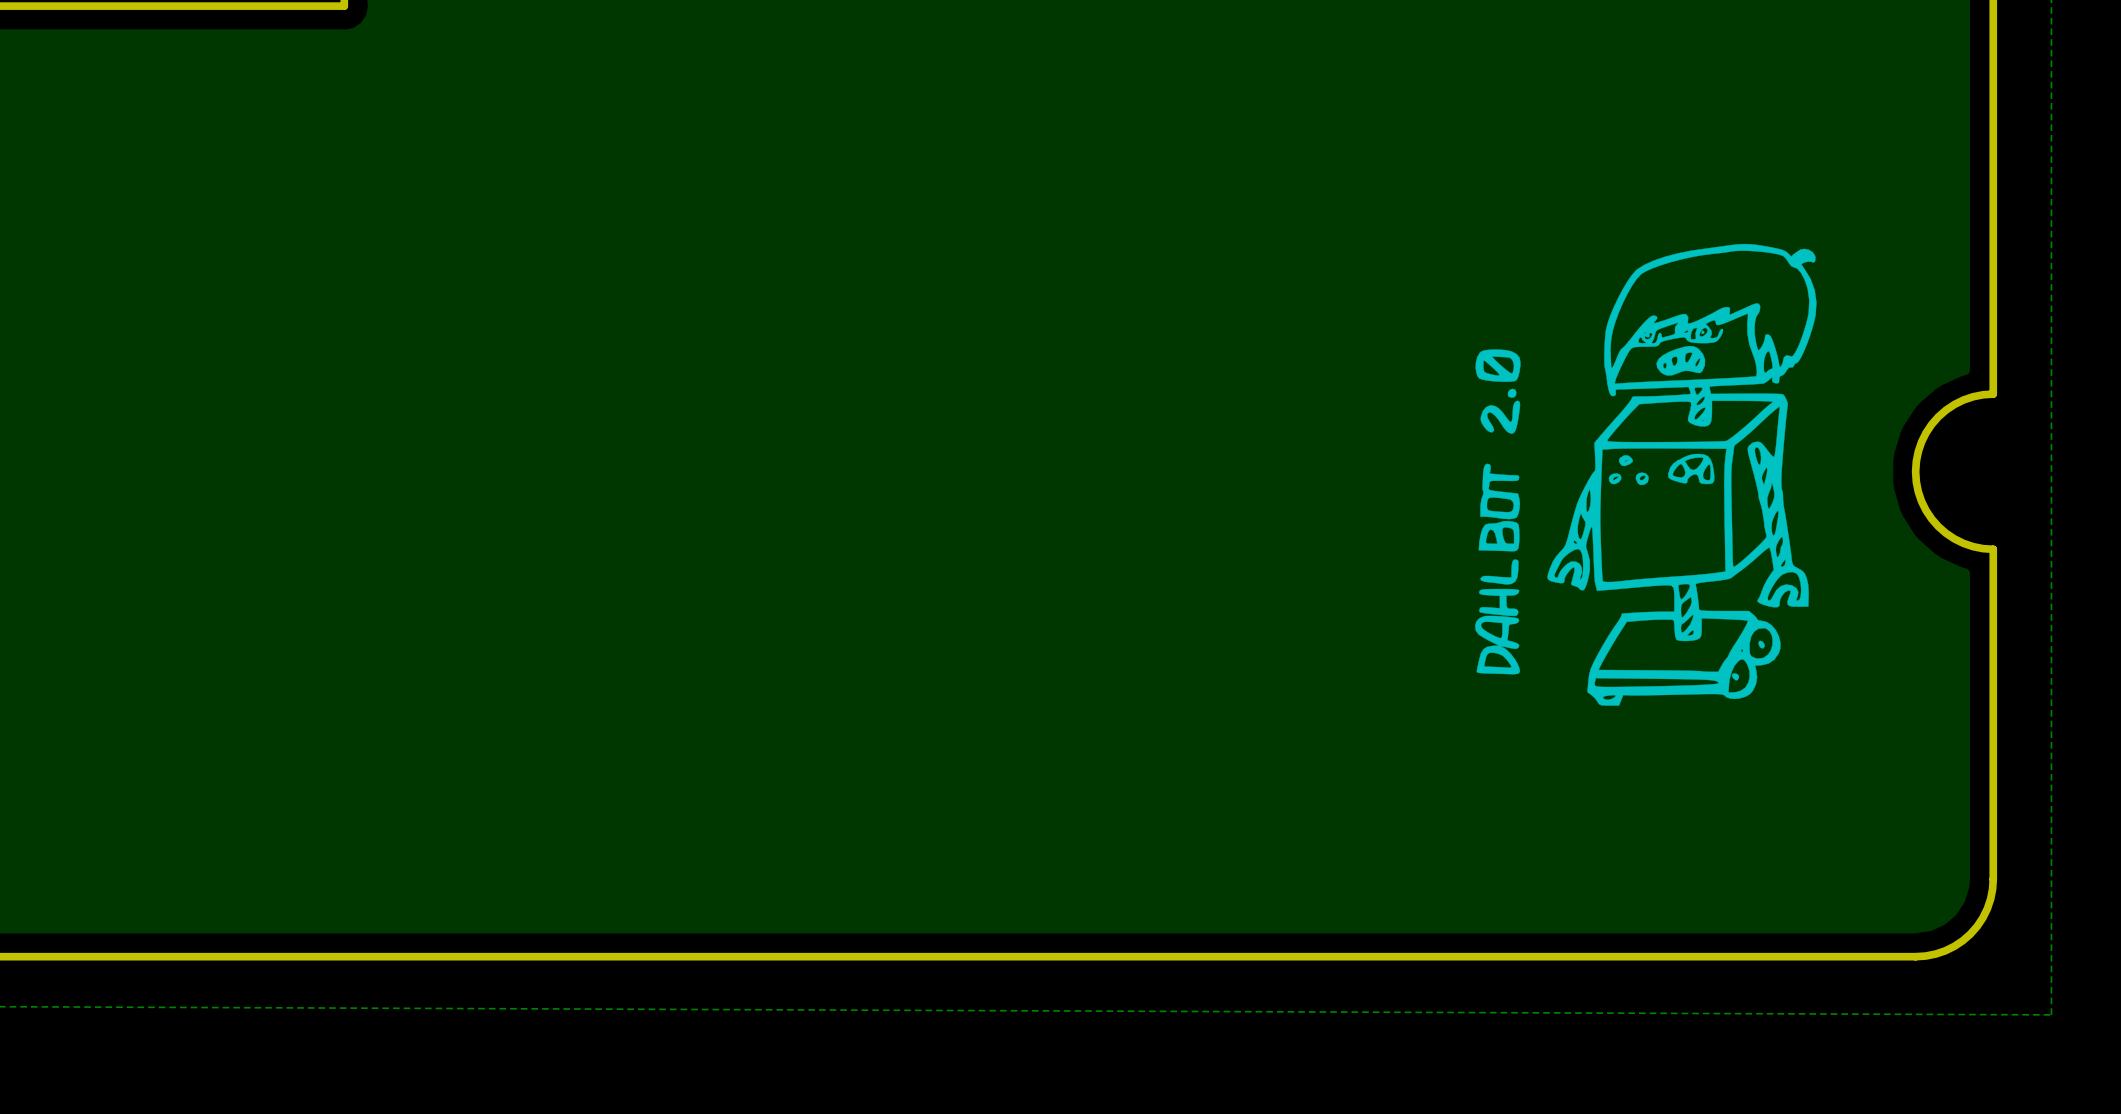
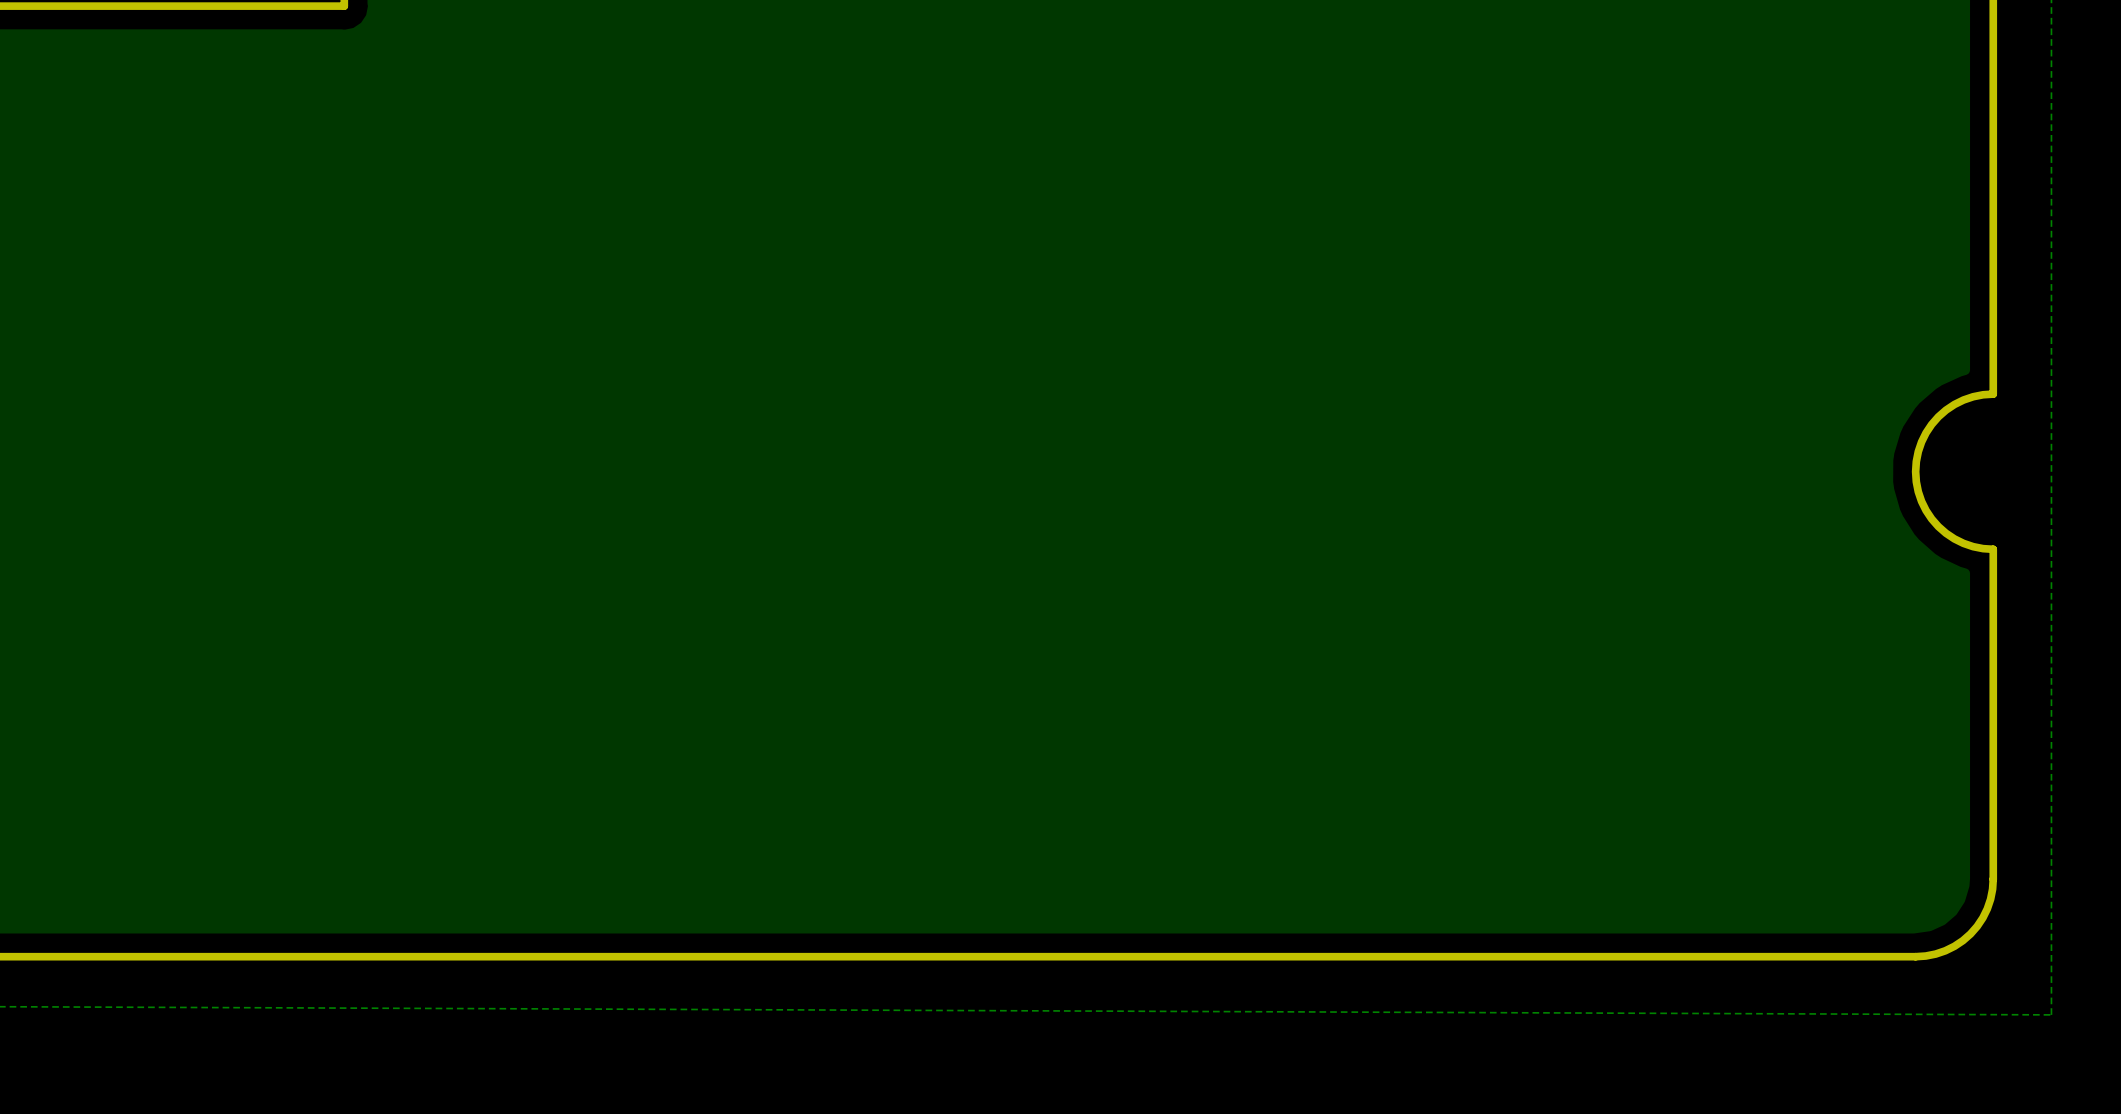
drawing: [1475, 243, 1817, 706] -> none

